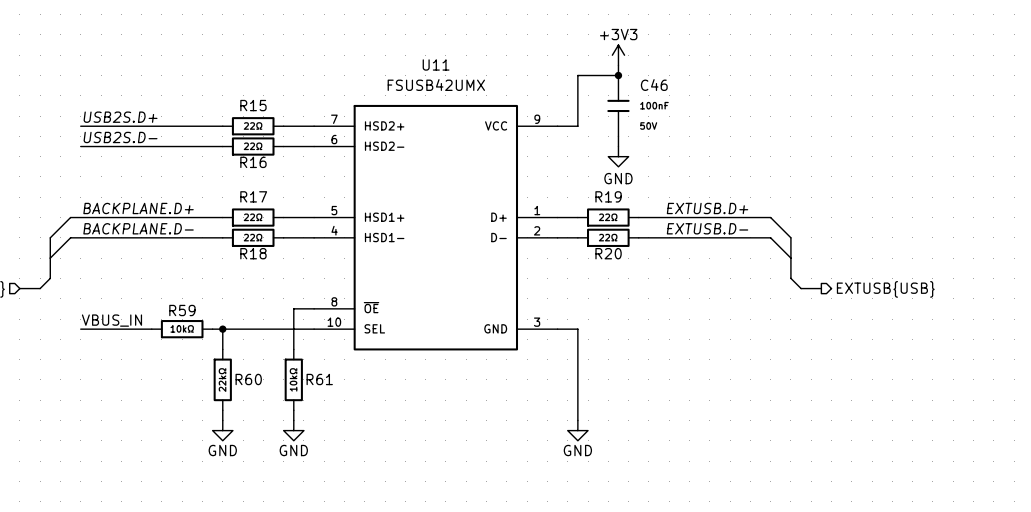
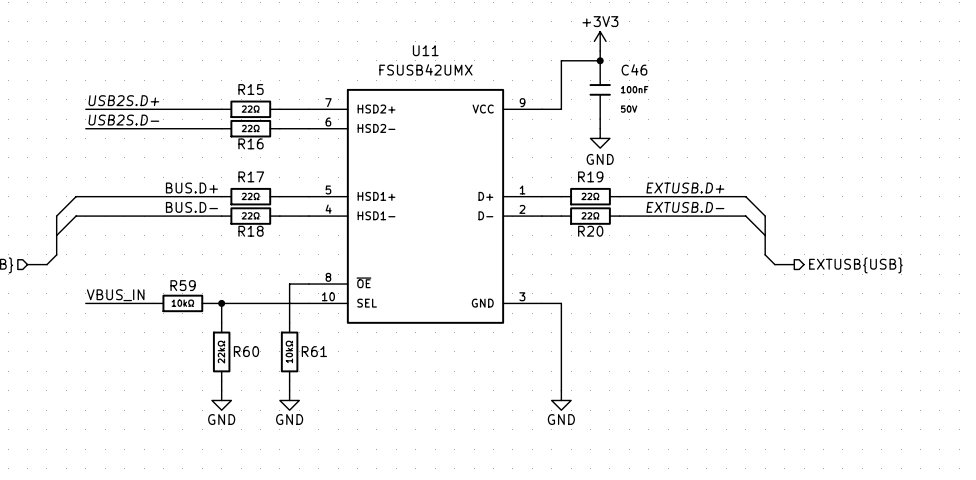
label: BACKPLANE.D+ (138, 208) -> none
label: none -> BUS.D+ (191, 188)
label: BACKPLANE.D- (138, 228) -> none
label: none -> BUS.D- (191, 207)

